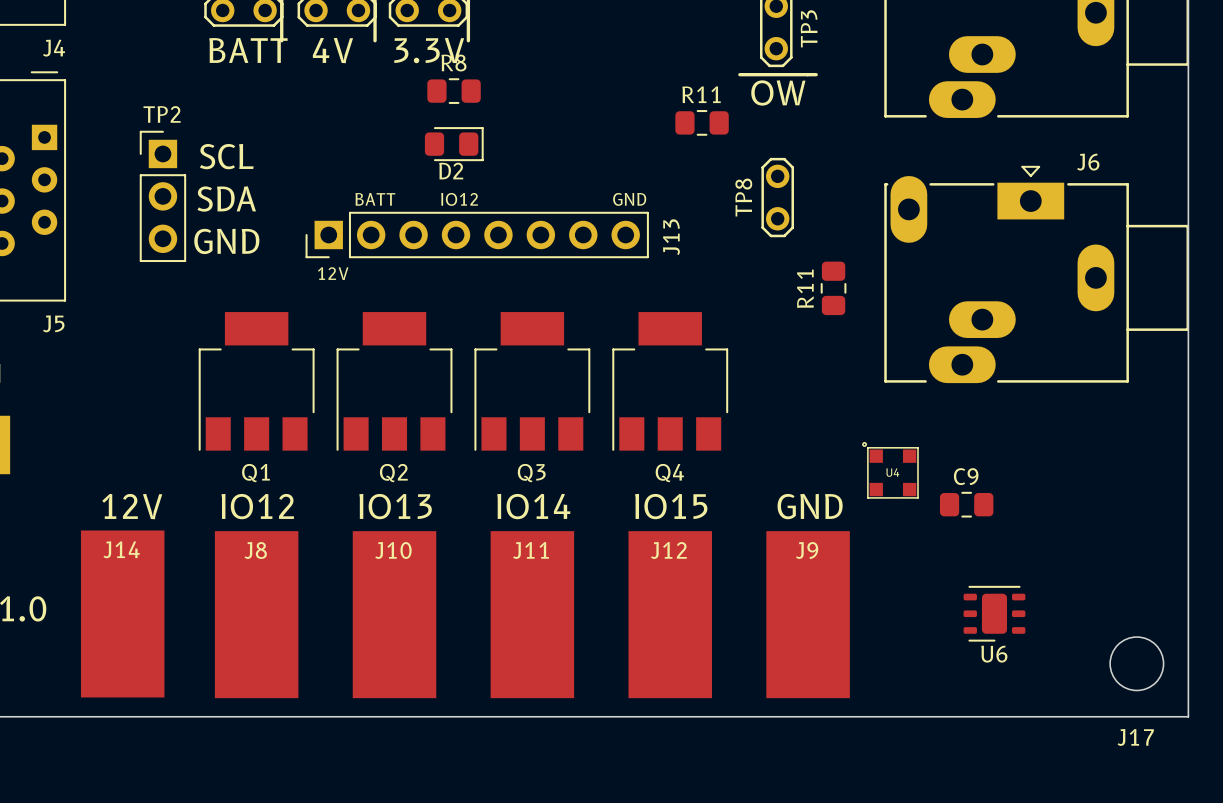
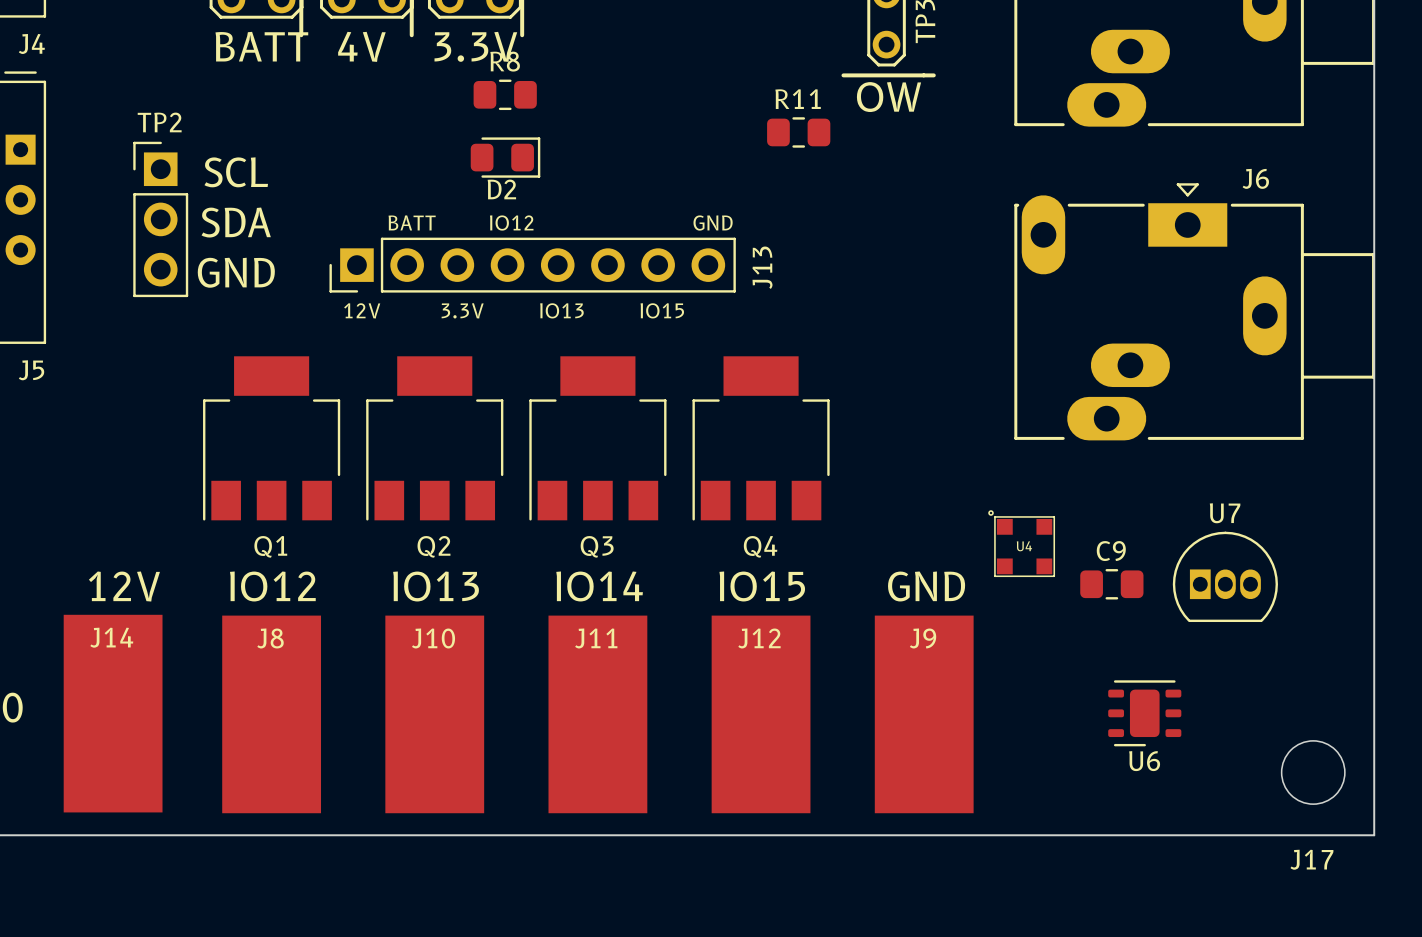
TP8: (777, 197) -> none
text: none -> 3.3V (462, 310)
text: none -> IO13 (561, 310)
text: none -> IO15 (662, 310)
R11: (833, 288) -> none
U7: none -> (1225, 576)

